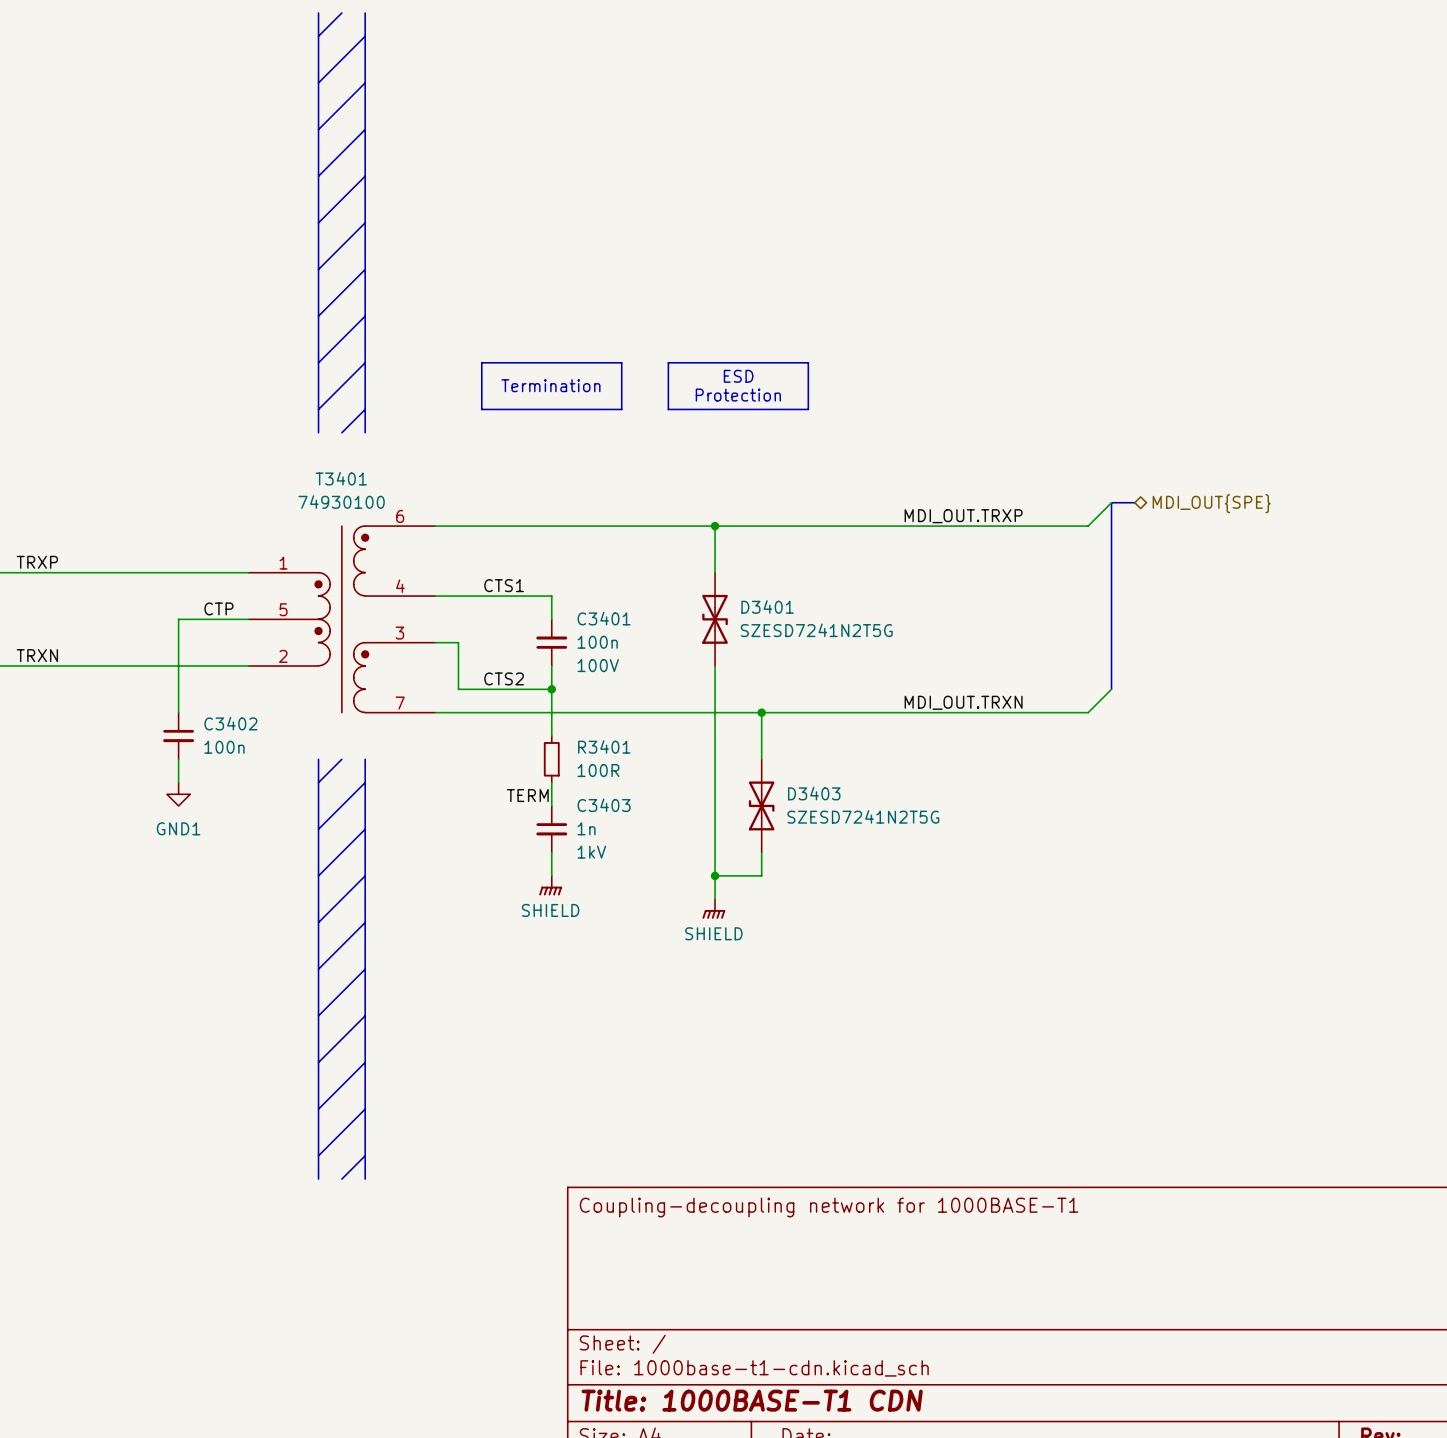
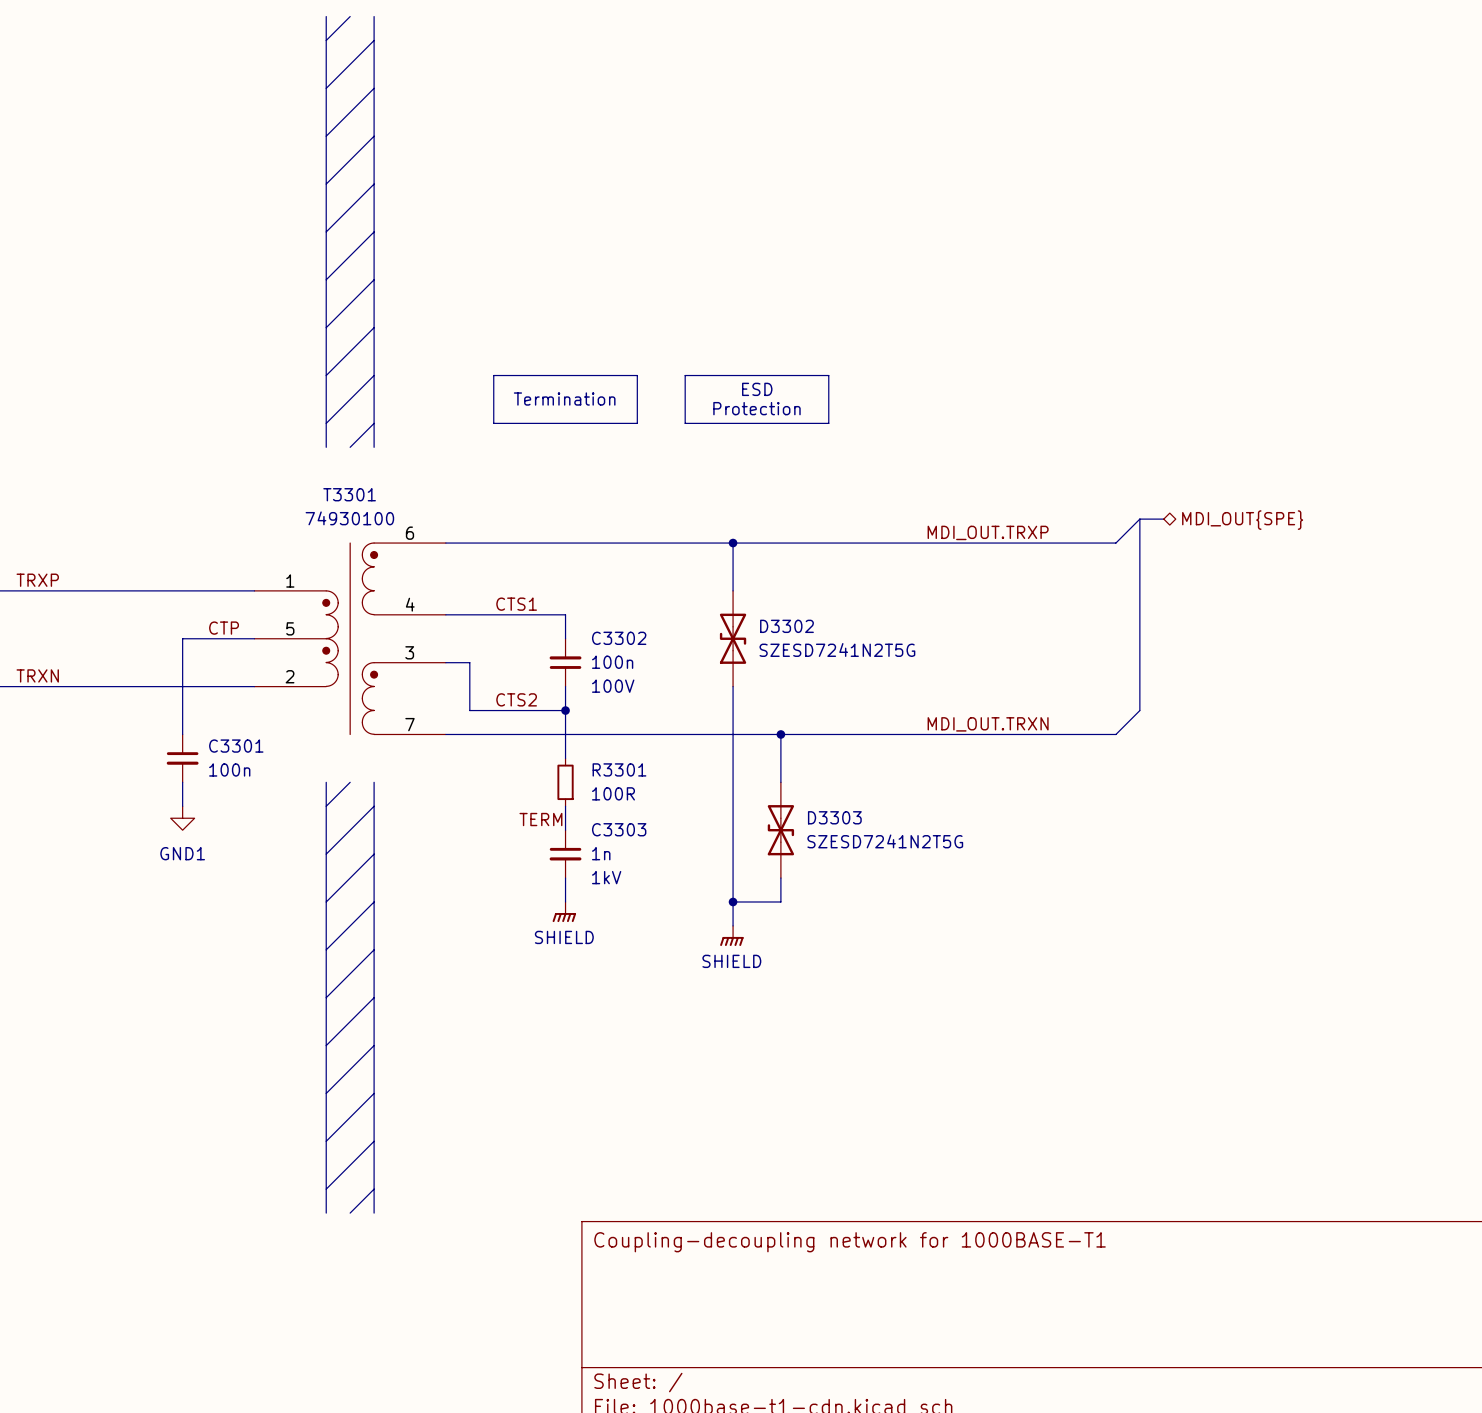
T3401 name: T3401 (341, 478) -> T3301 (349, 494)
D3401 name: D3401 (767, 606) -> D3302 (786, 626)
C3401 name: C3401 (604, 618) -> C3302 (619, 638)
C3402 name: C3402 (230, 723) -> C3301 (236, 746)
R3401 name: R3401 (604, 746) -> R3301 (619, 769)
D3403 name: D3403 (814, 793) -> D3303 (834, 817)
C3403 name: C3403 (604, 805) -> C3303 (619, 829)

